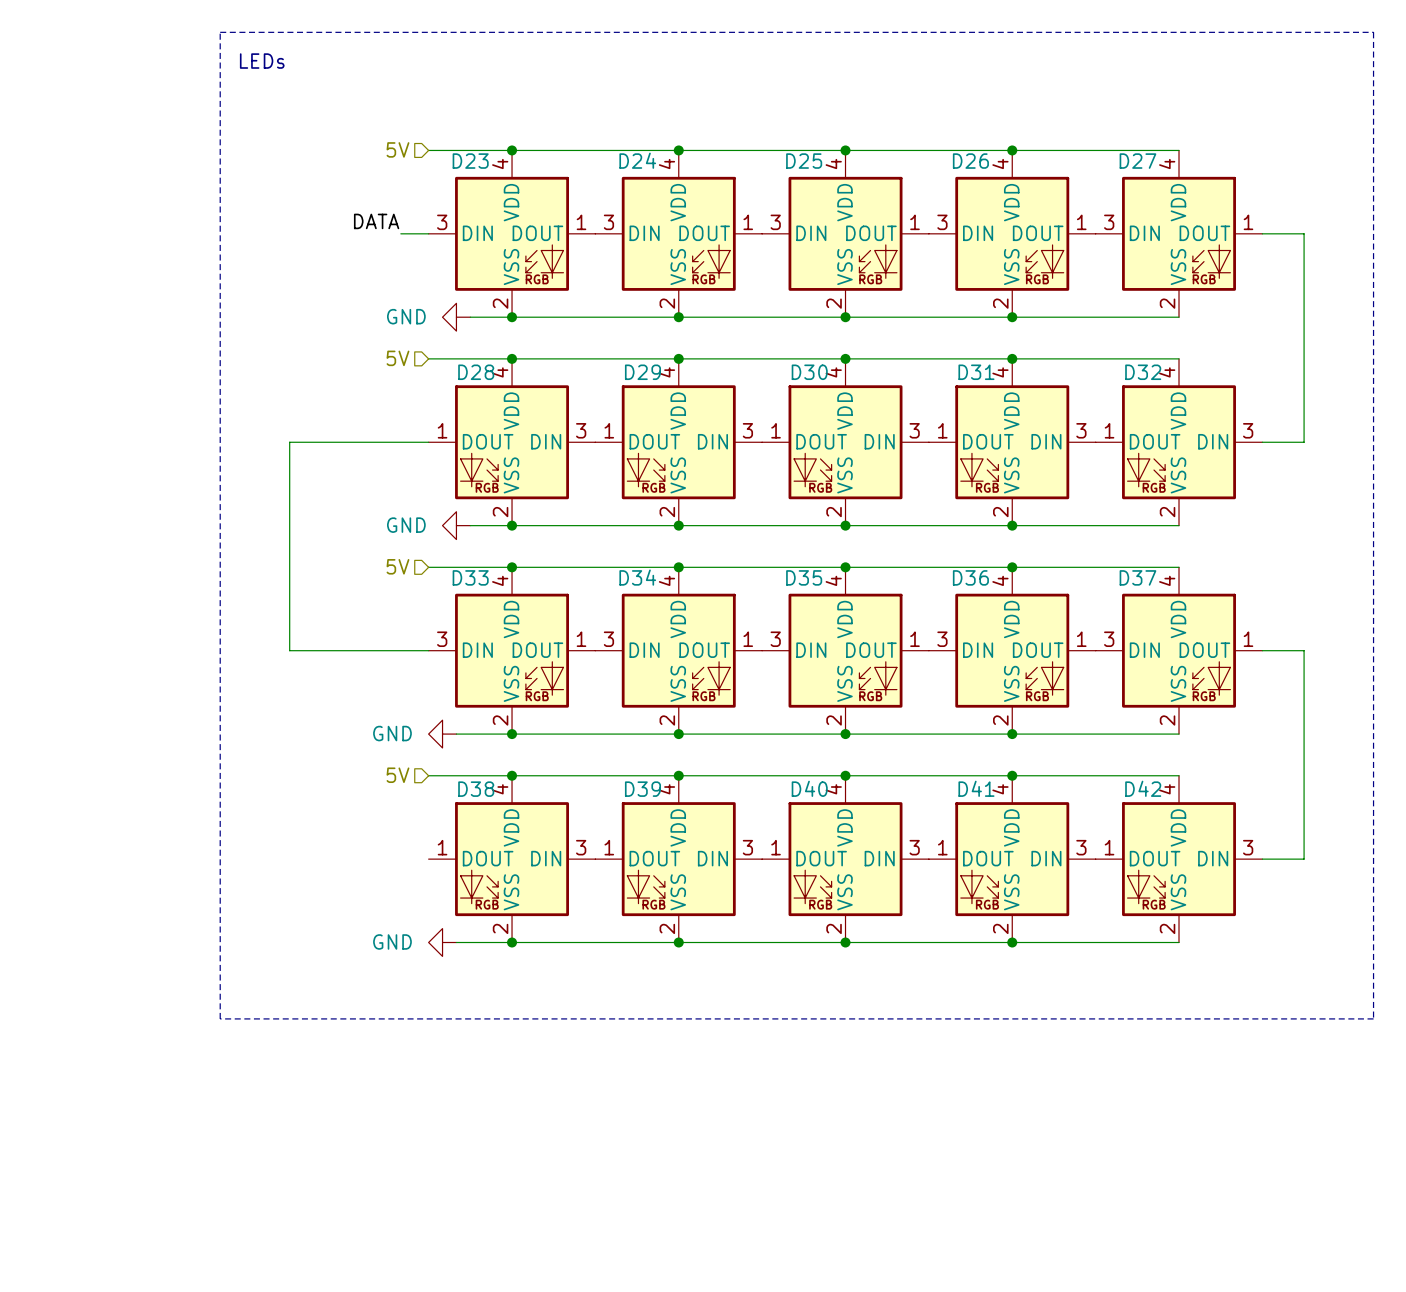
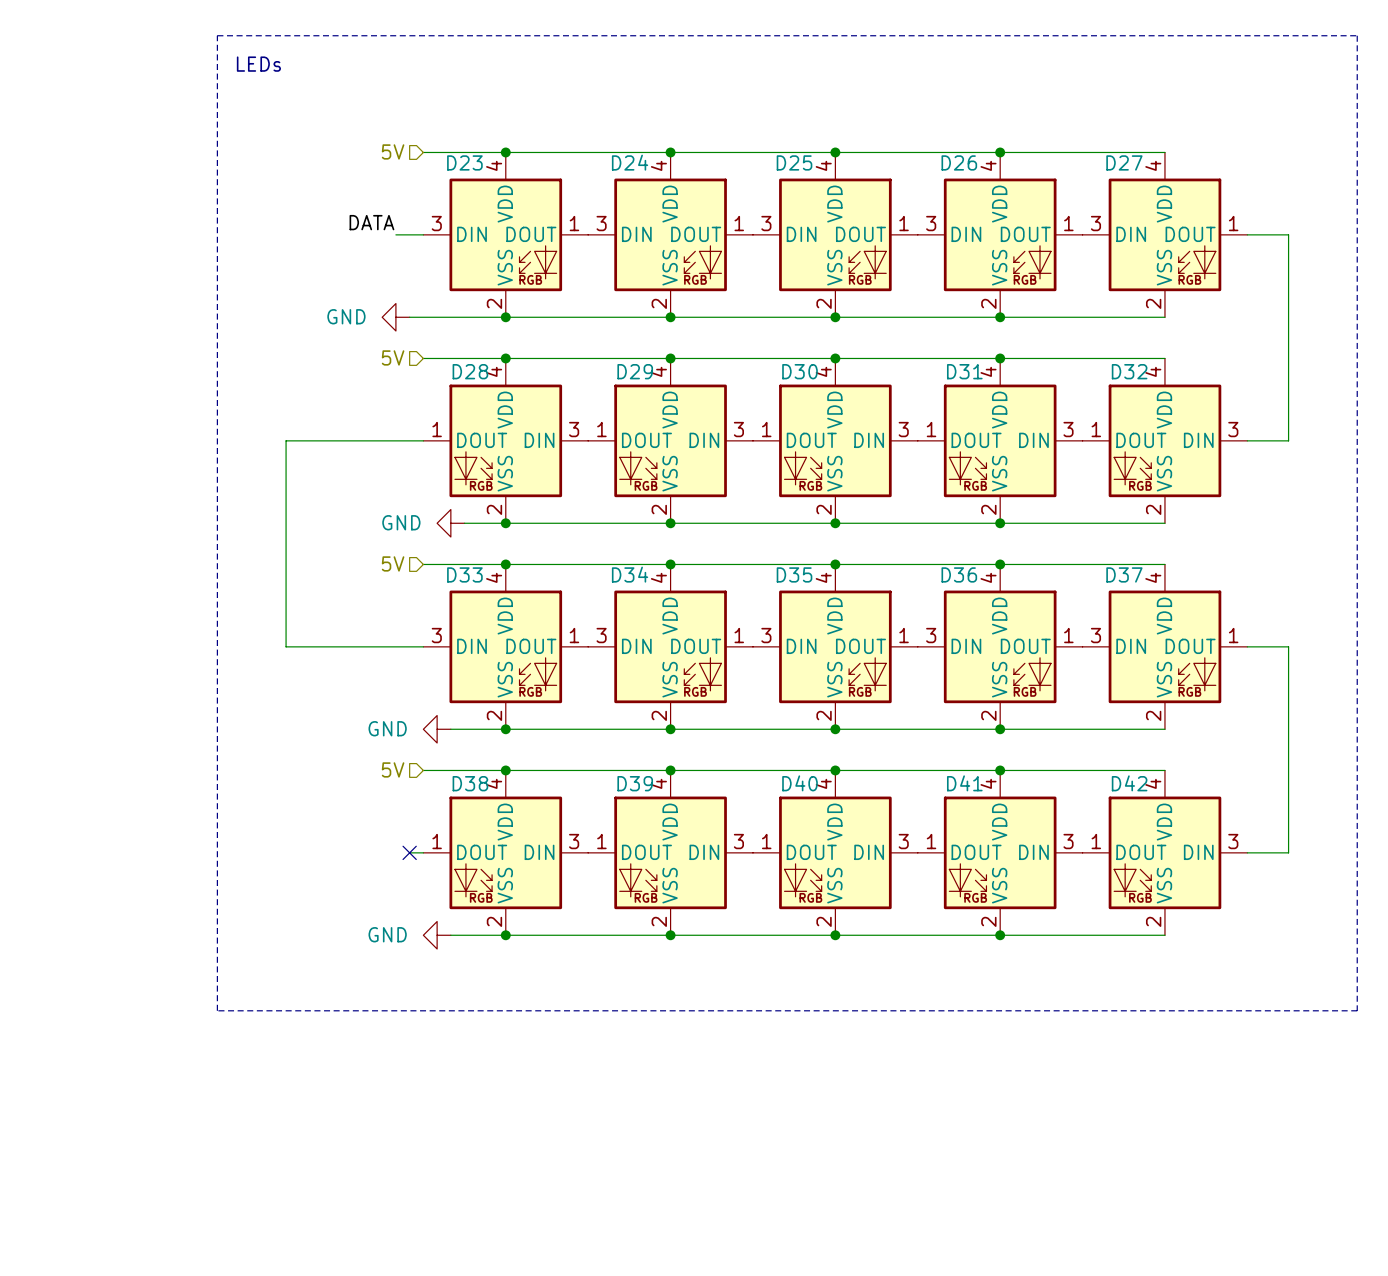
wire: none -> (409, 317) (464, 317)
power symbol position: GND (456, 317) -> GND (395, 317)
wire: none -> (409, 852) (423, 852)
no-connect mark: none -> (409, 852)

